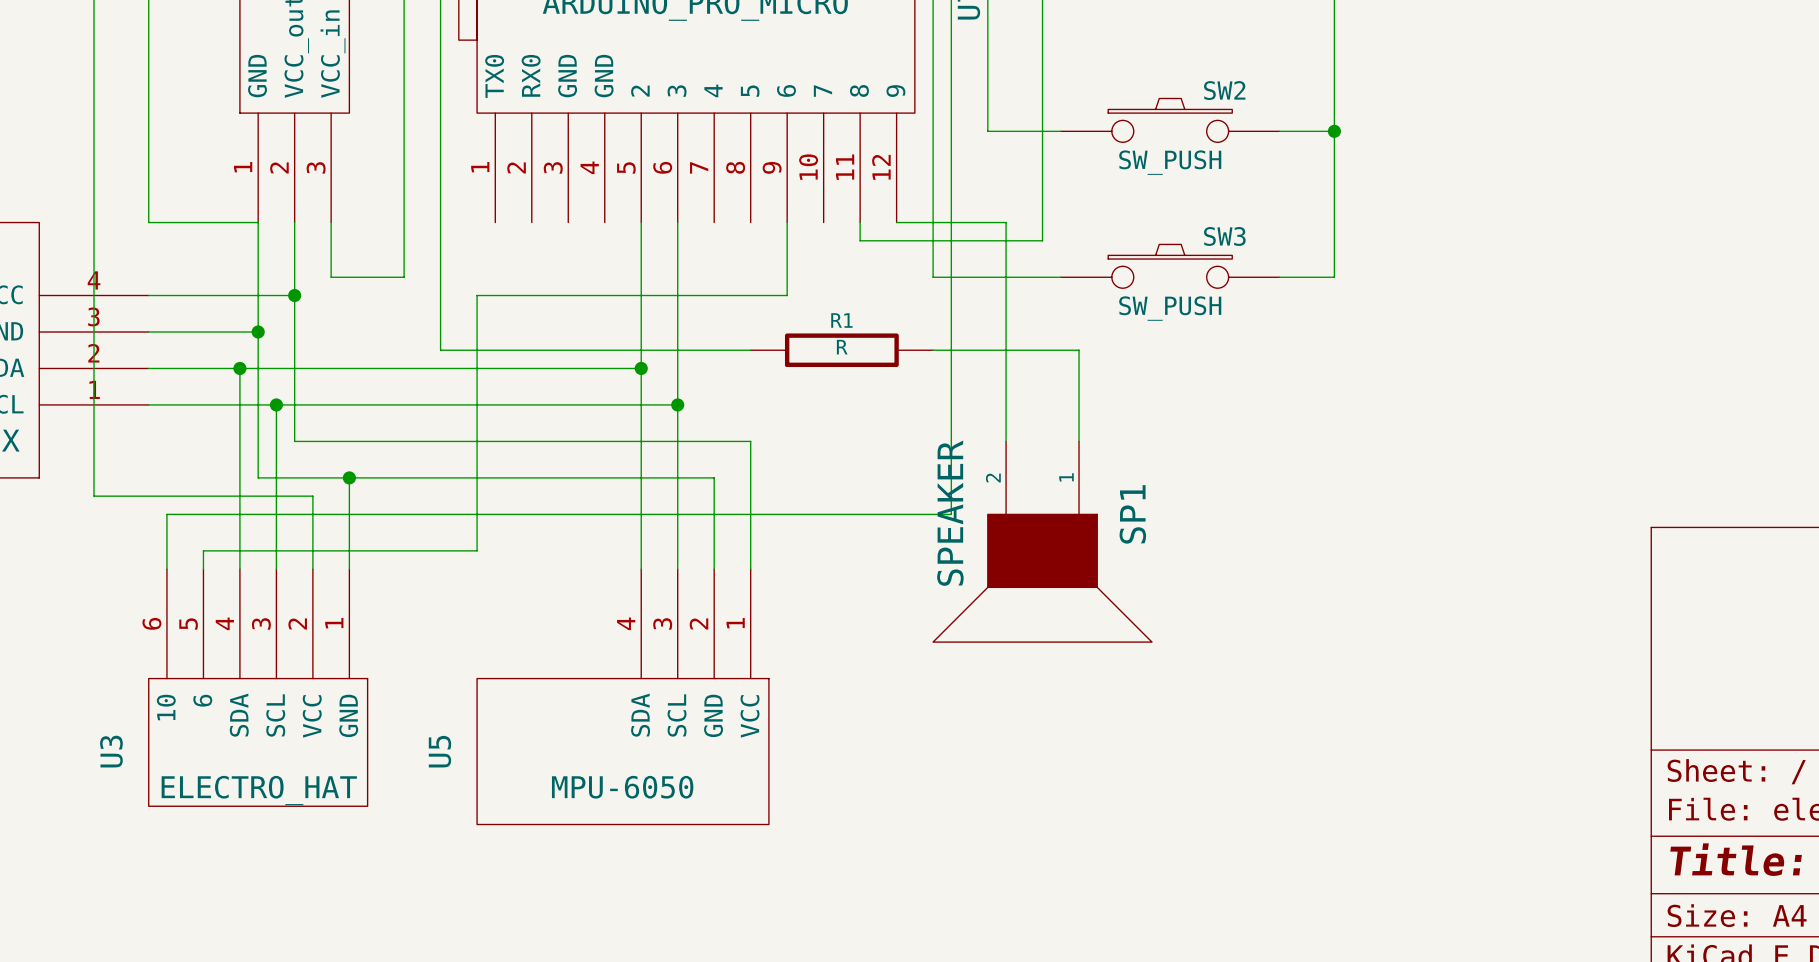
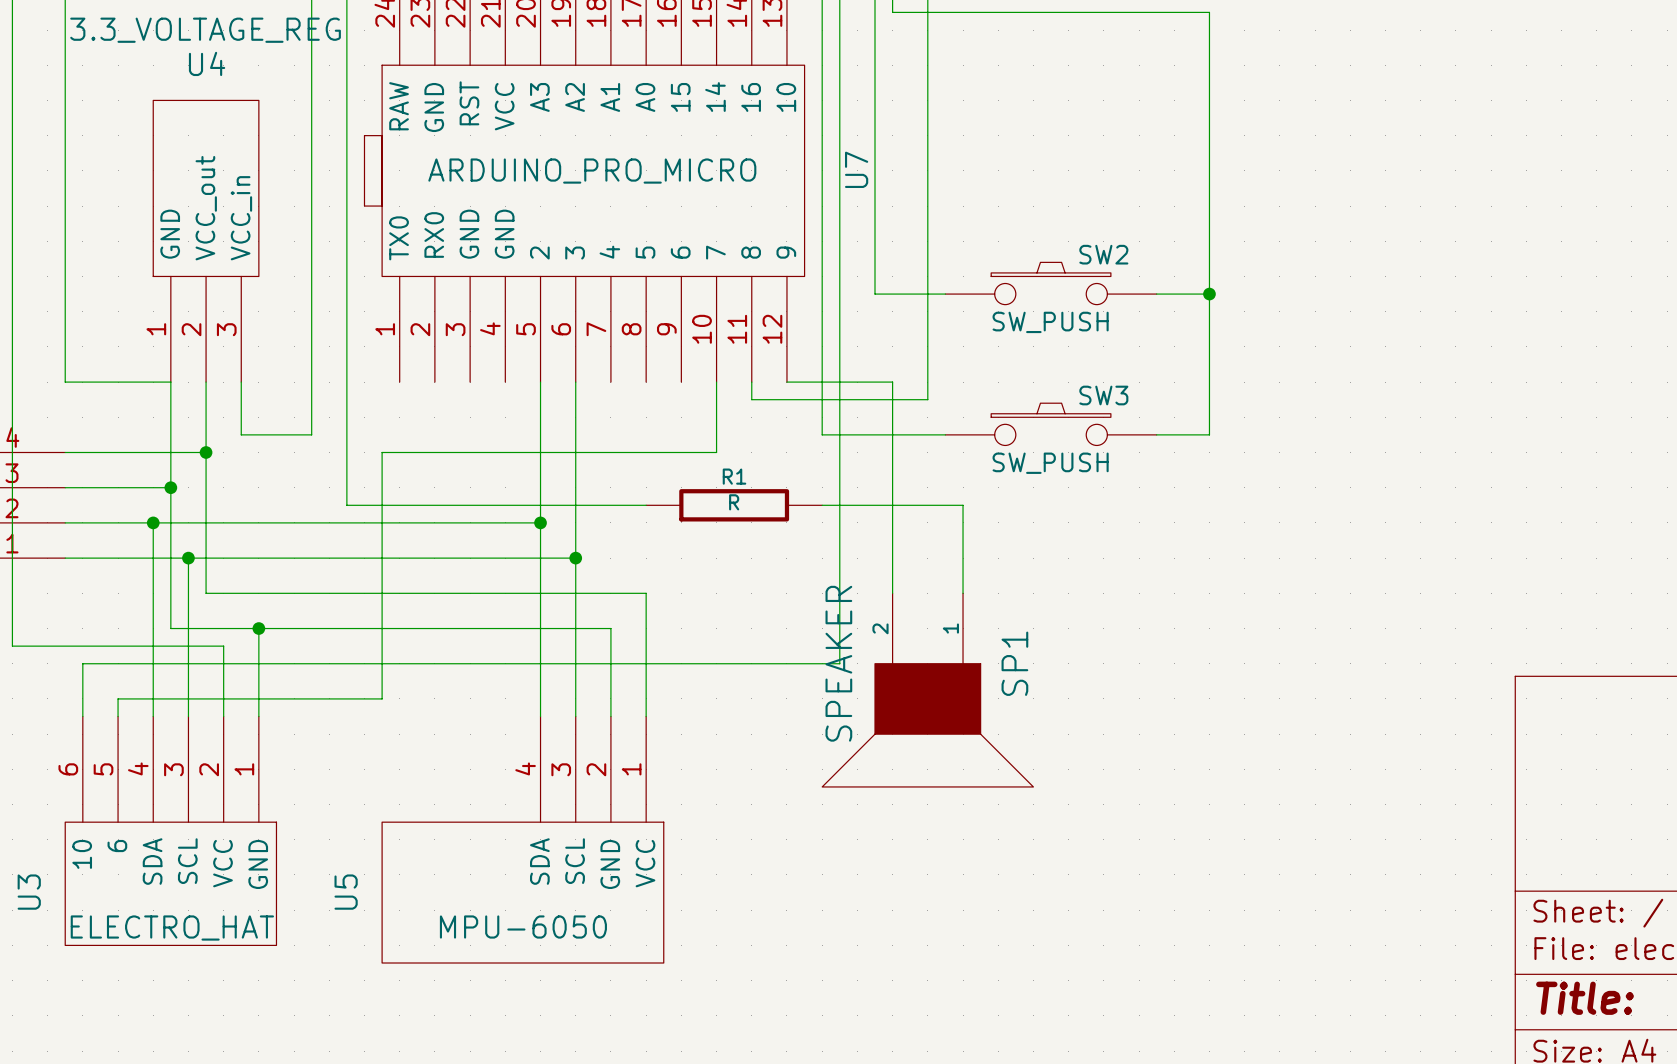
wire: (787, 222) (787, 295) -> (716, 382) (716, 452) (681, 452)

